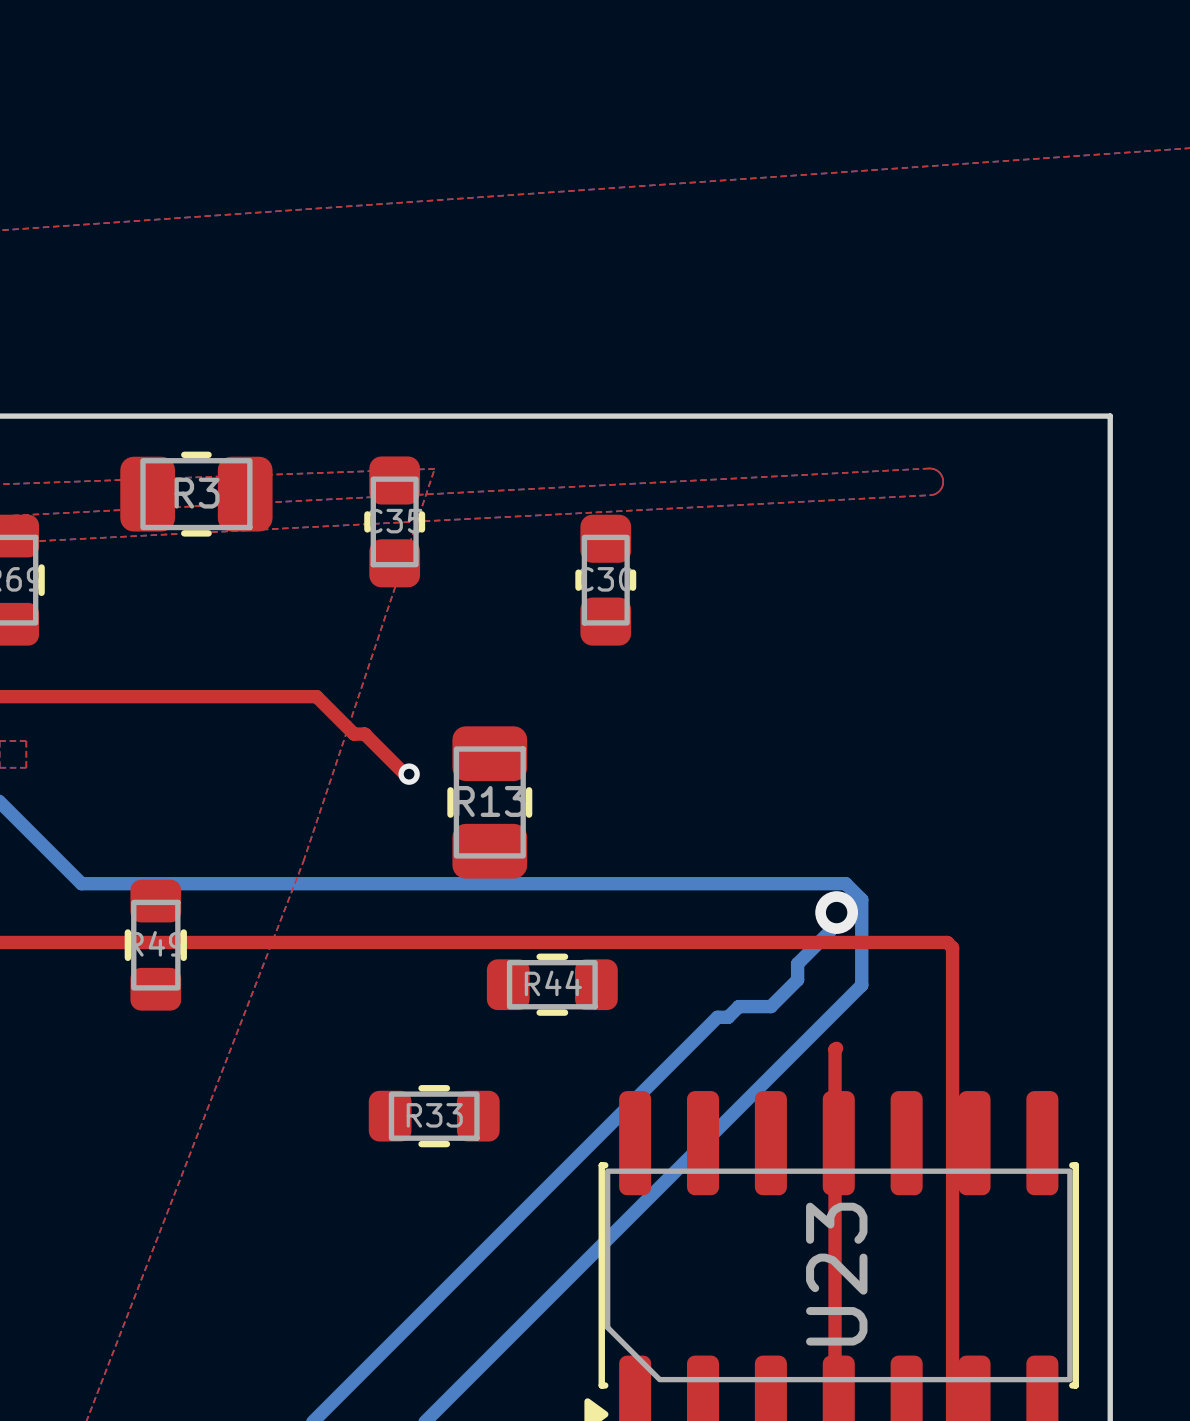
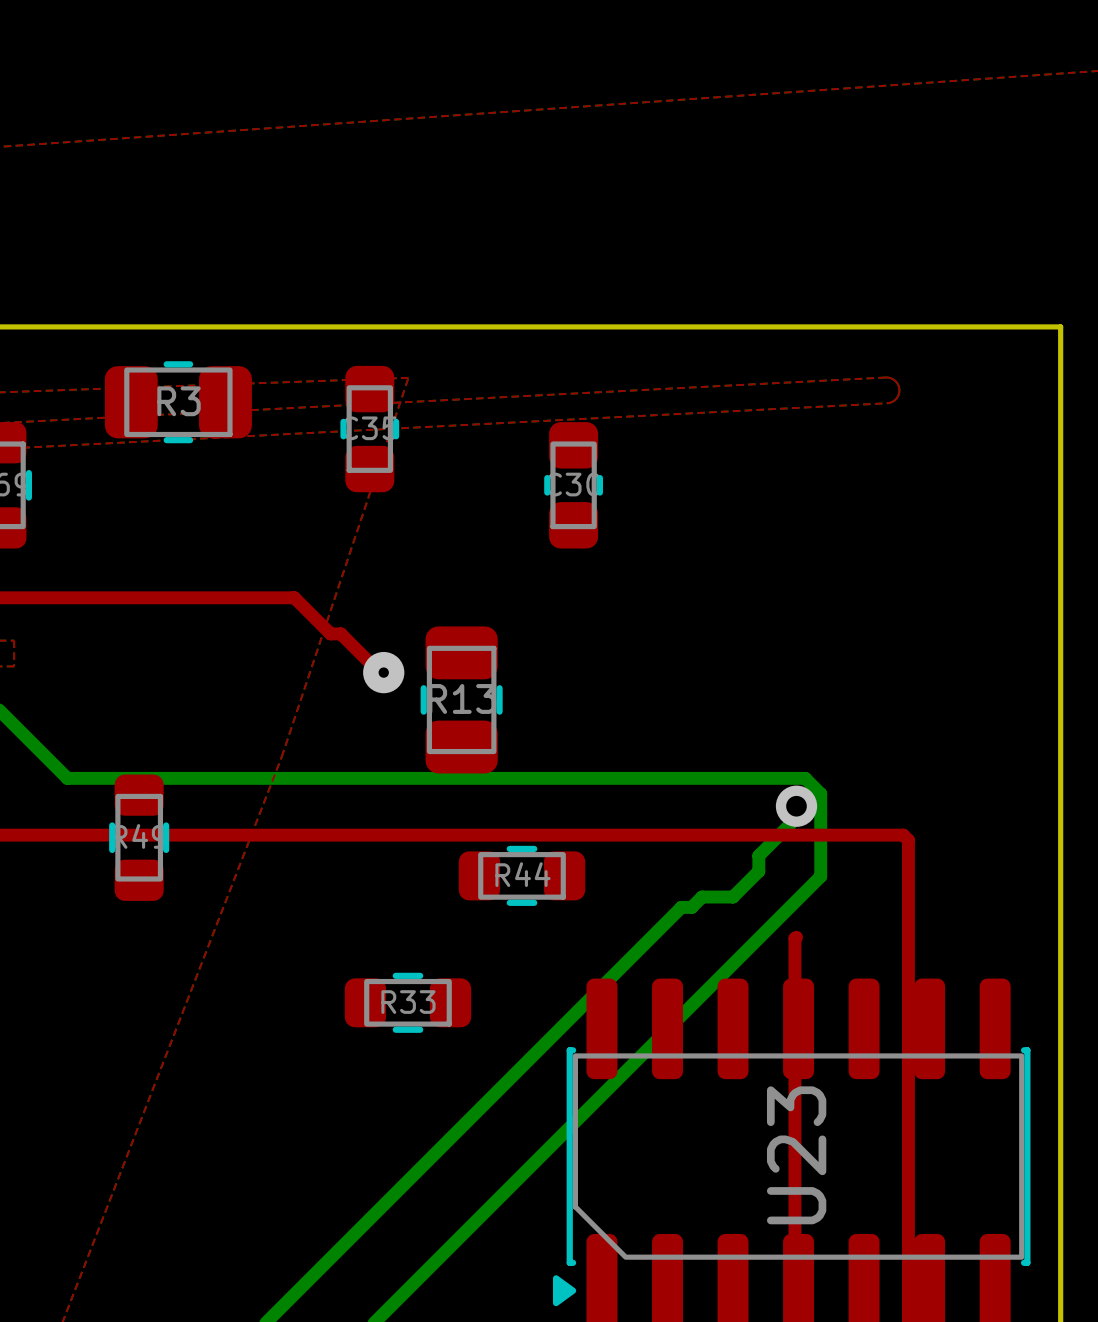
via size: [398, 763, 420, 785] -> [363, 651, 405, 694]

